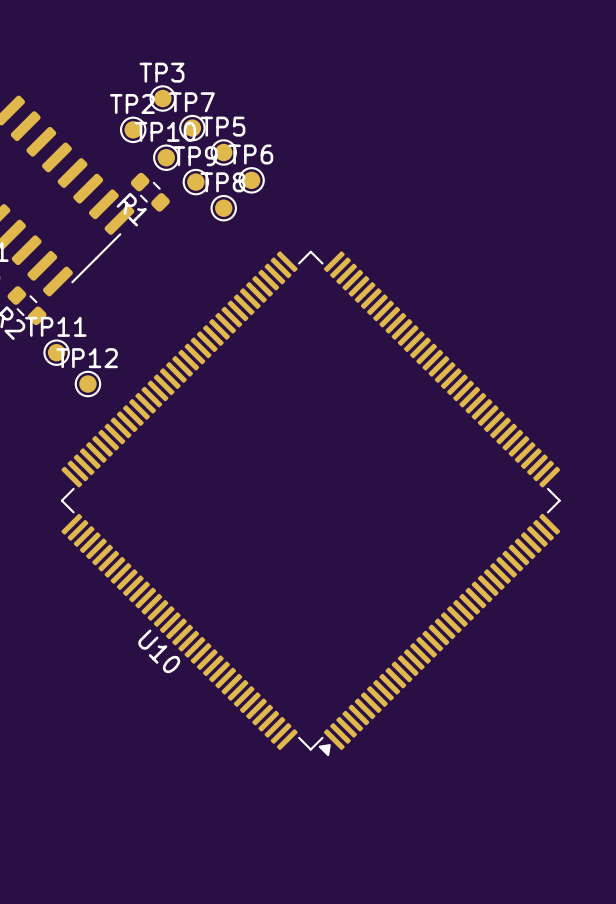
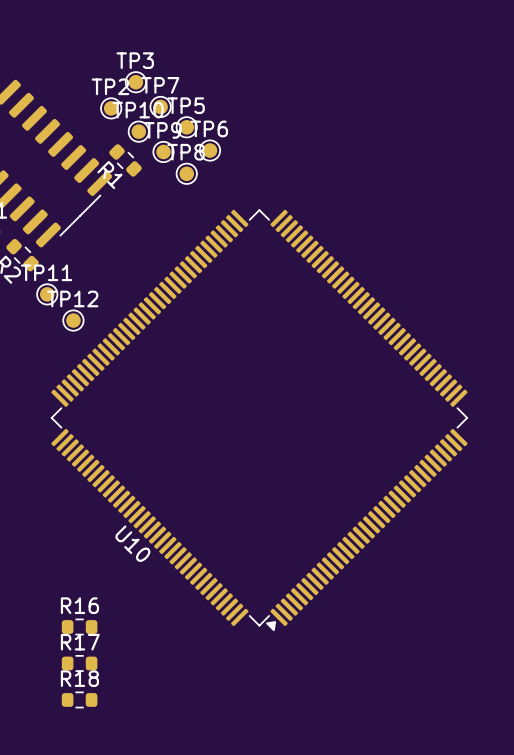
R16: none -> (79, 627)
R17: none -> (79, 663)
R18: none -> (79, 699)

